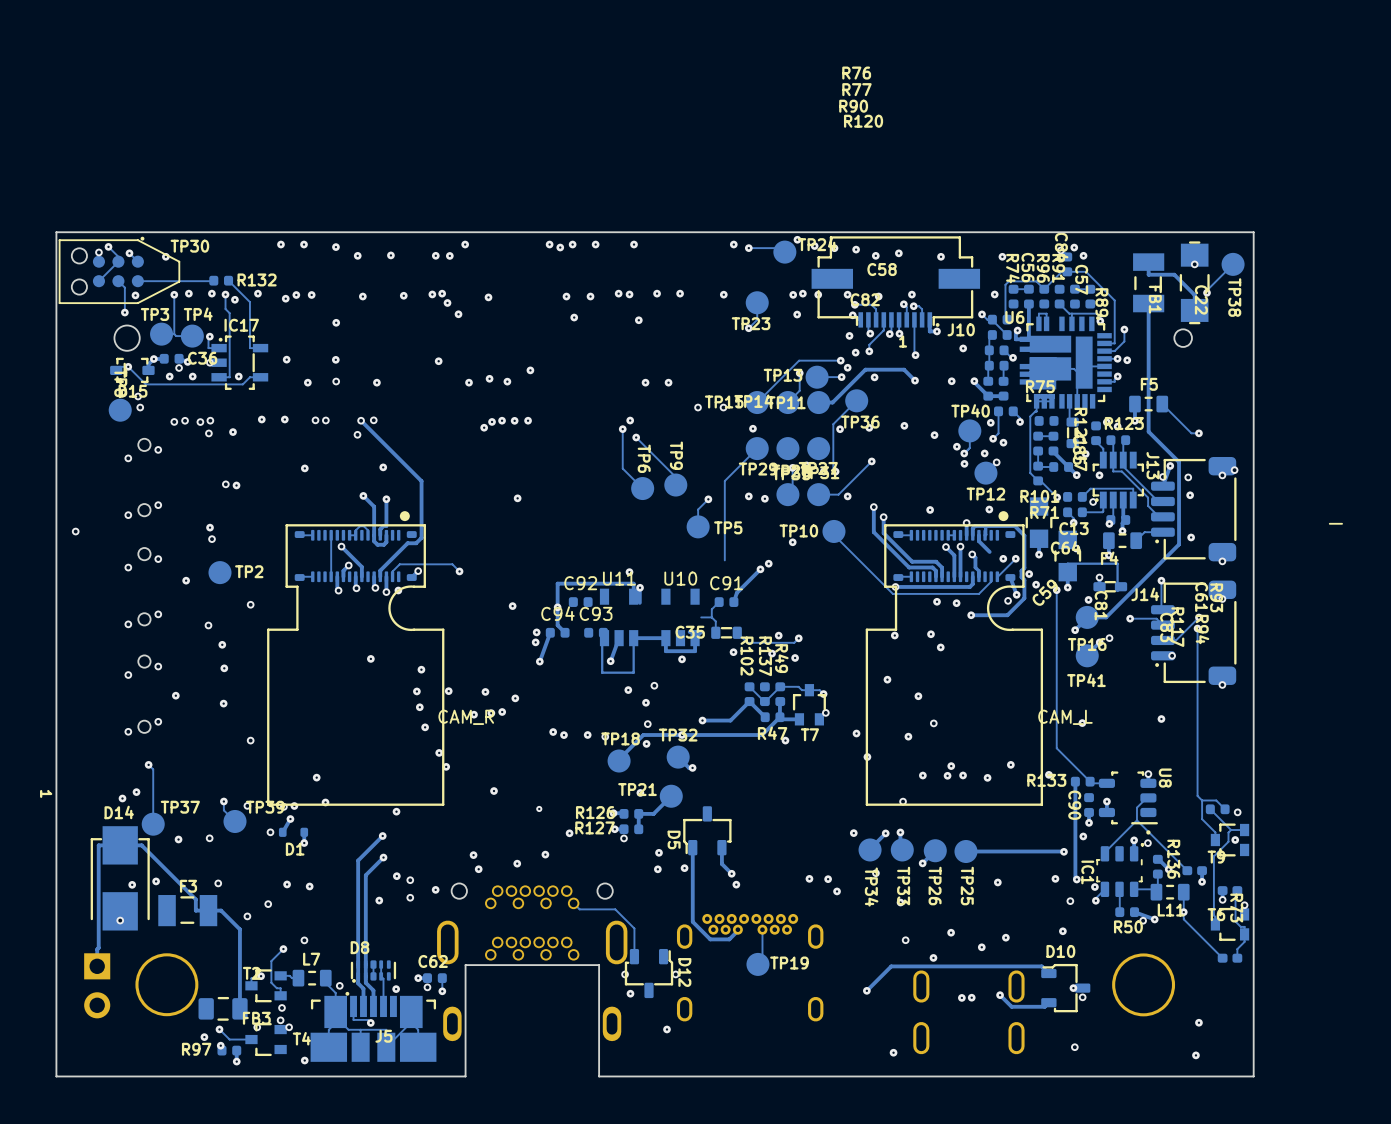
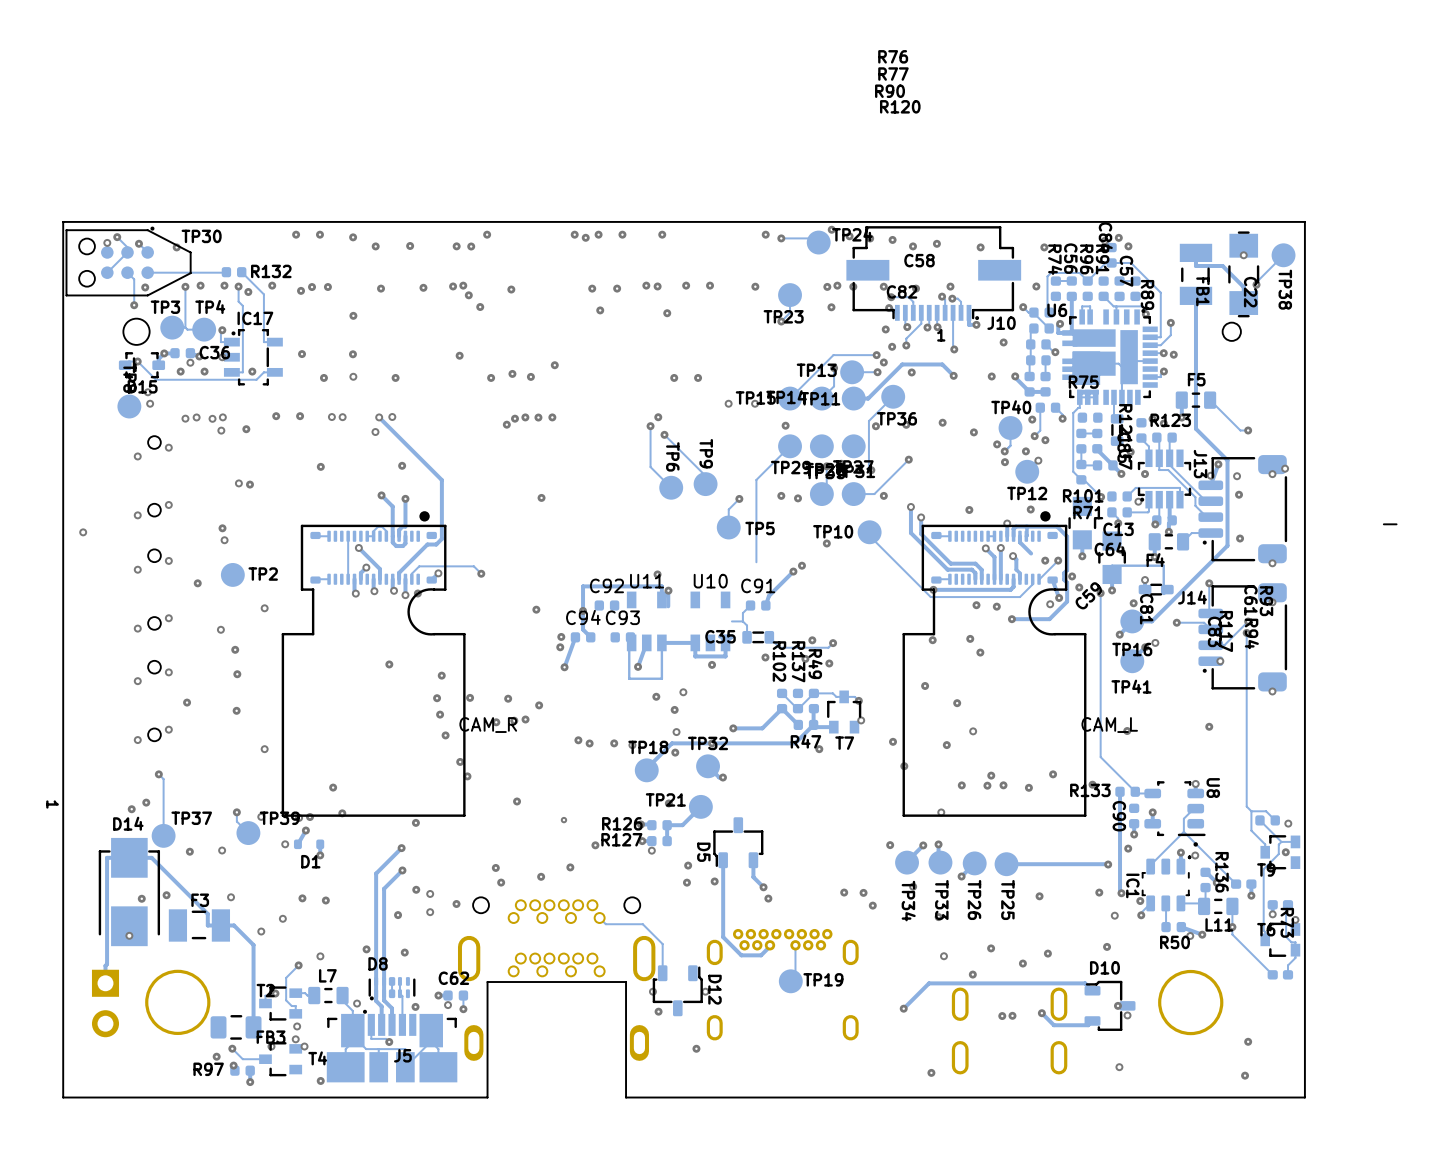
via: none -> (366, 949)
via: none -> (404, 952)

